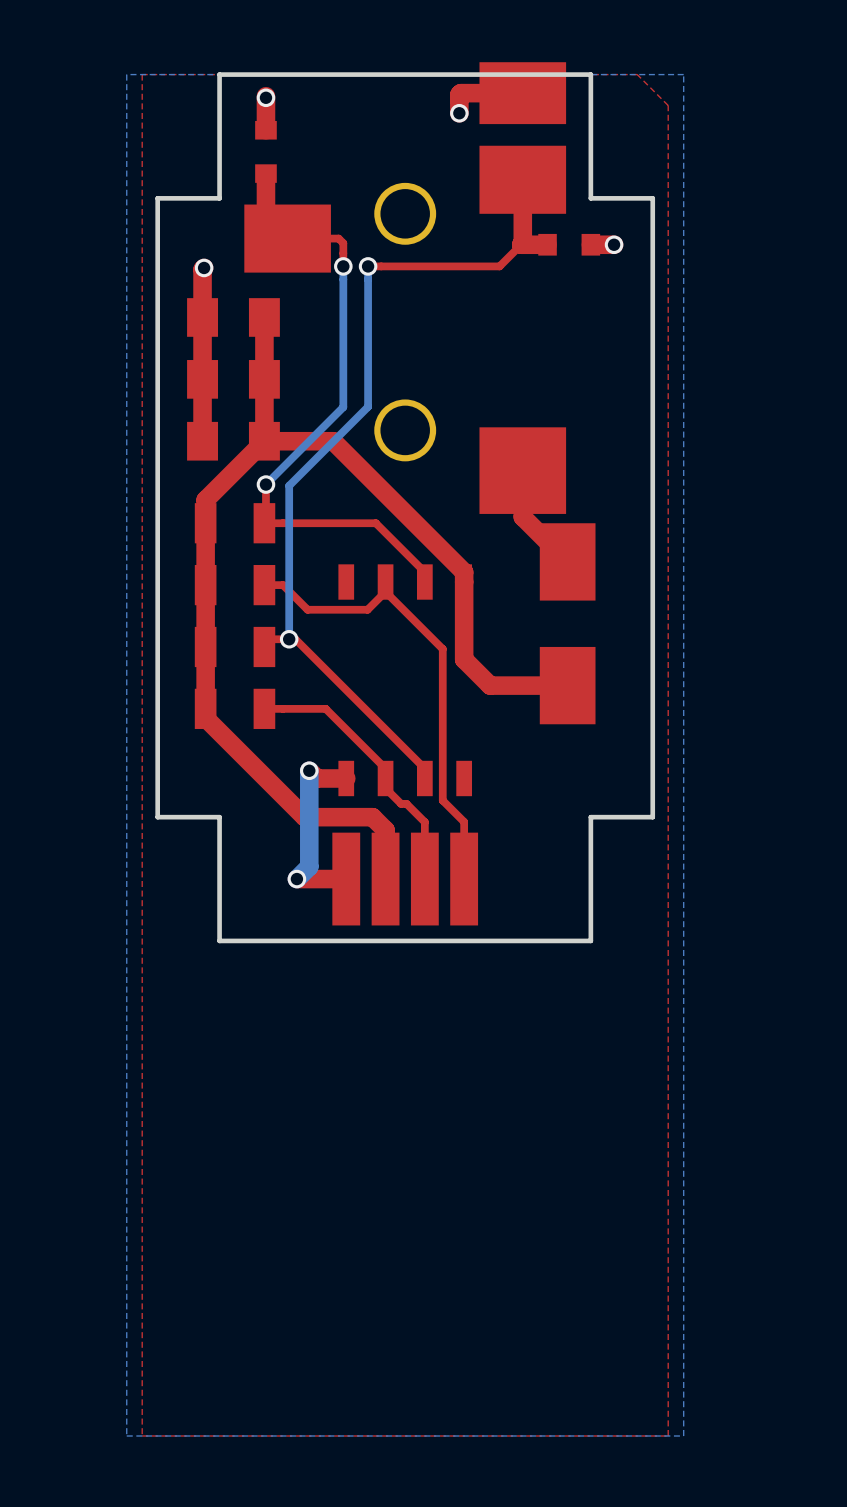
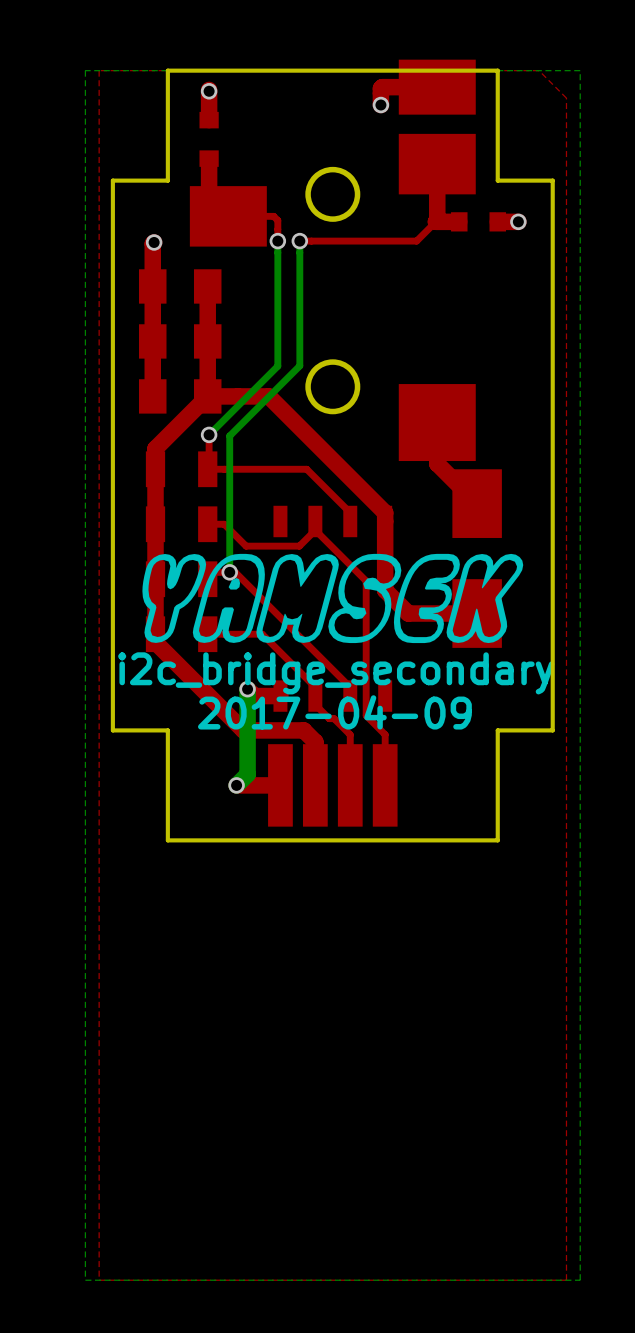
drawing: none -> [142, 553, 524, 644]
text: none -> i2c_bridge_secondary (336, 673)
text: none -> 2017-04-09 (334, 712)

